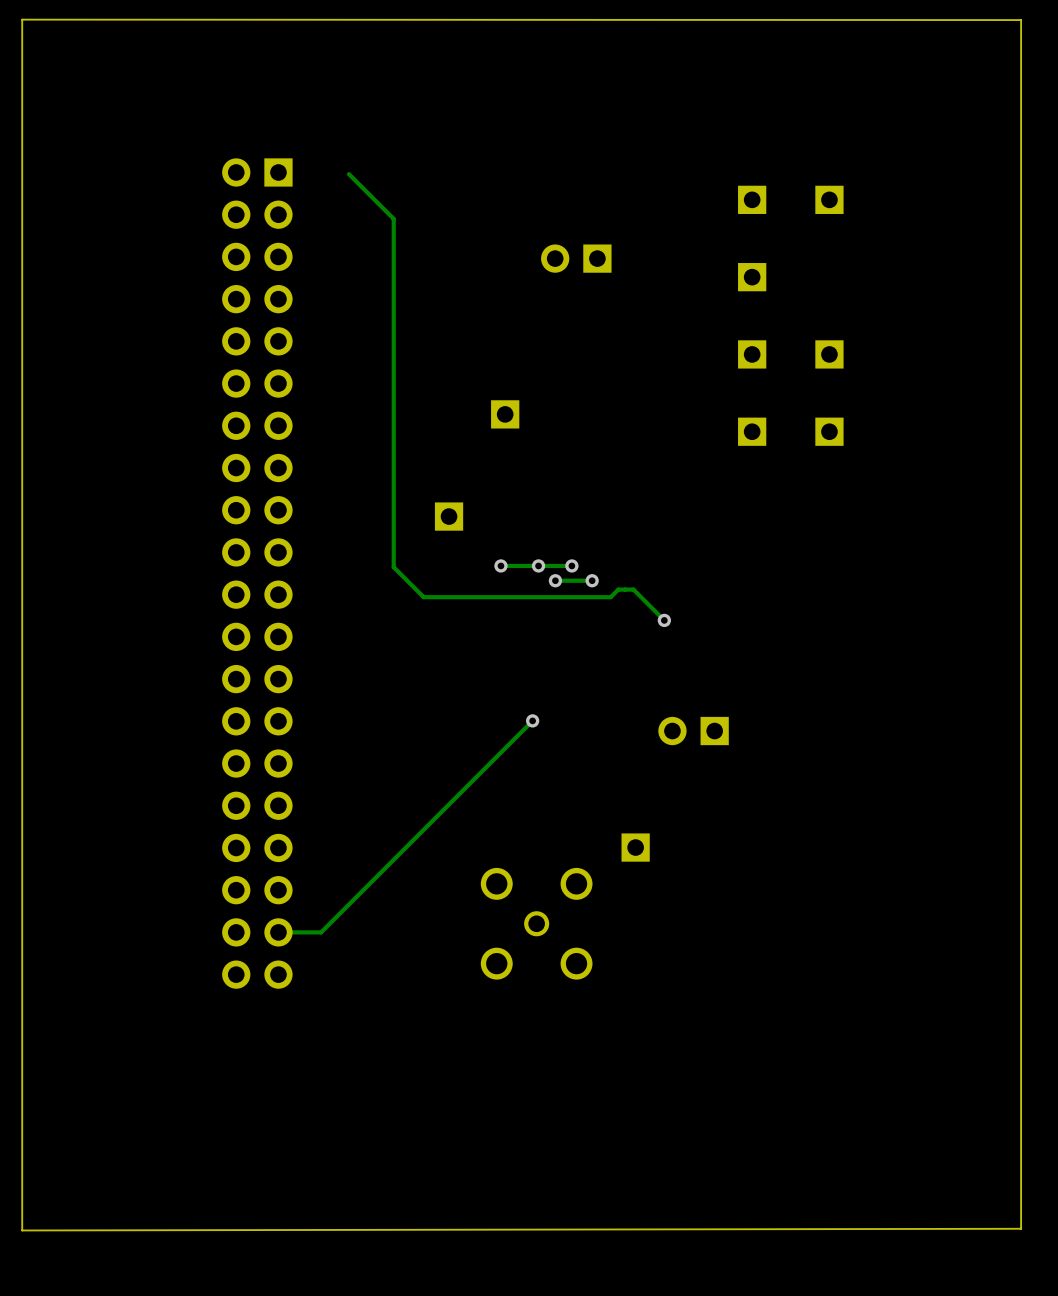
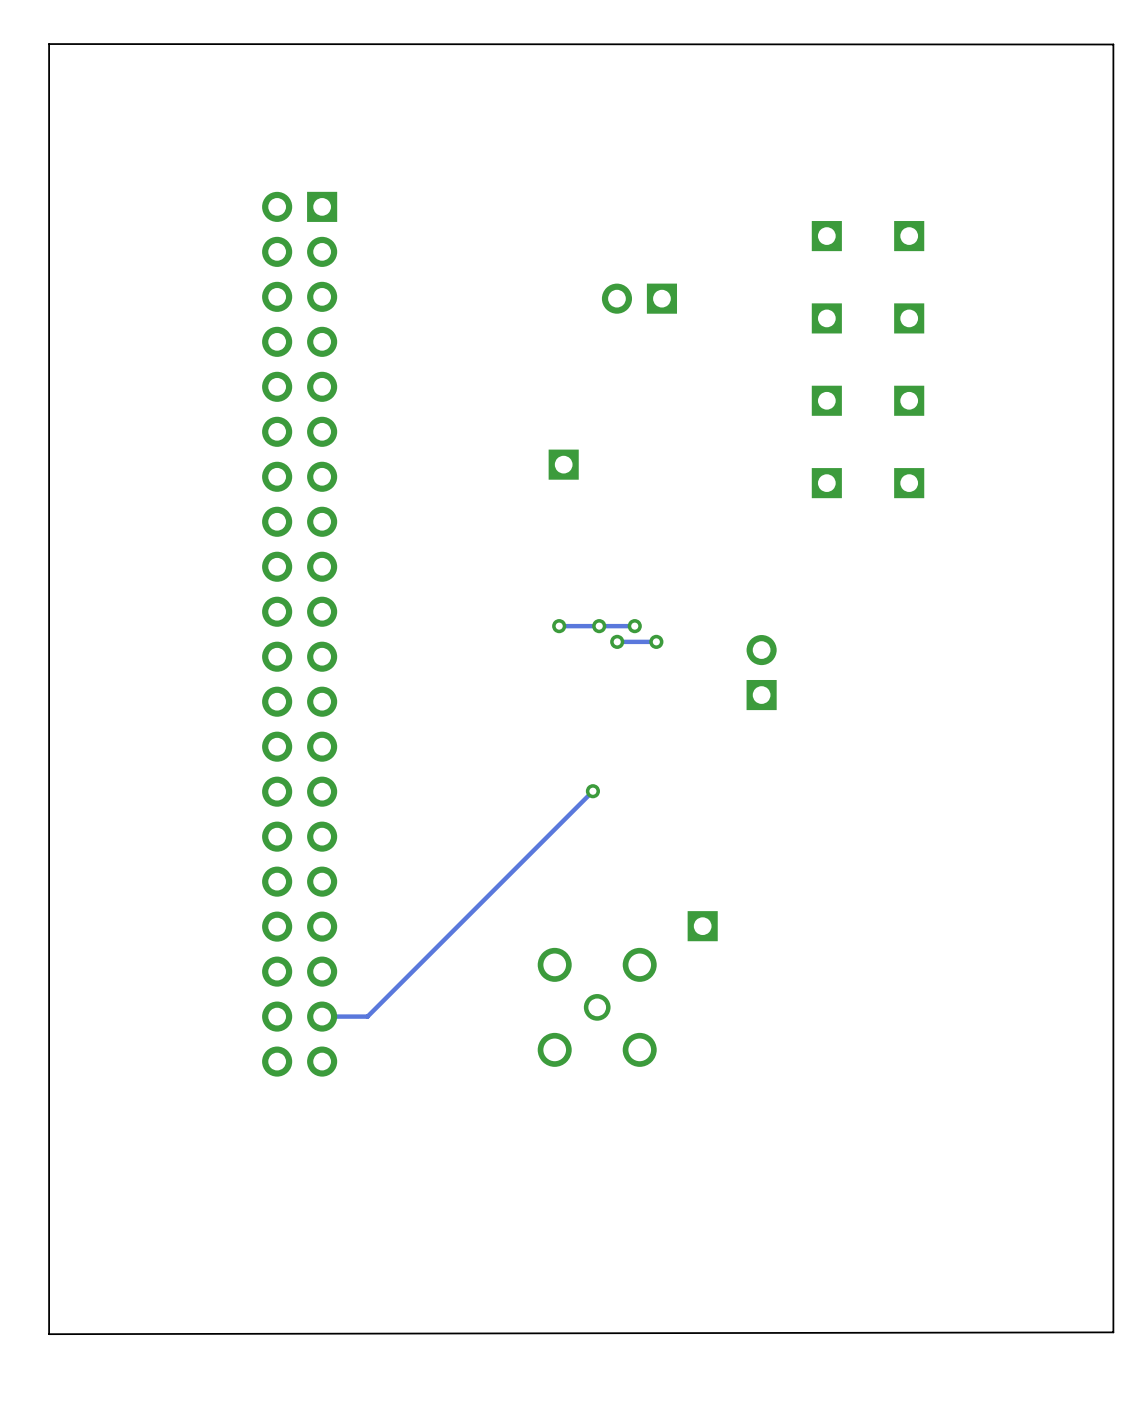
track: (348, 174) (393, 218) (393, 567) (423, 597) (610, 597) (618, 589) (633, 589) (664, 620) -> none
part: none -> (909, 318)
part: (449, 516) -> none
via: (664, 620) -> none
part rotation: 0° (693, 731) -> 90° clockwise (761, 672)
part position: (693, 731) -> (761, 672)

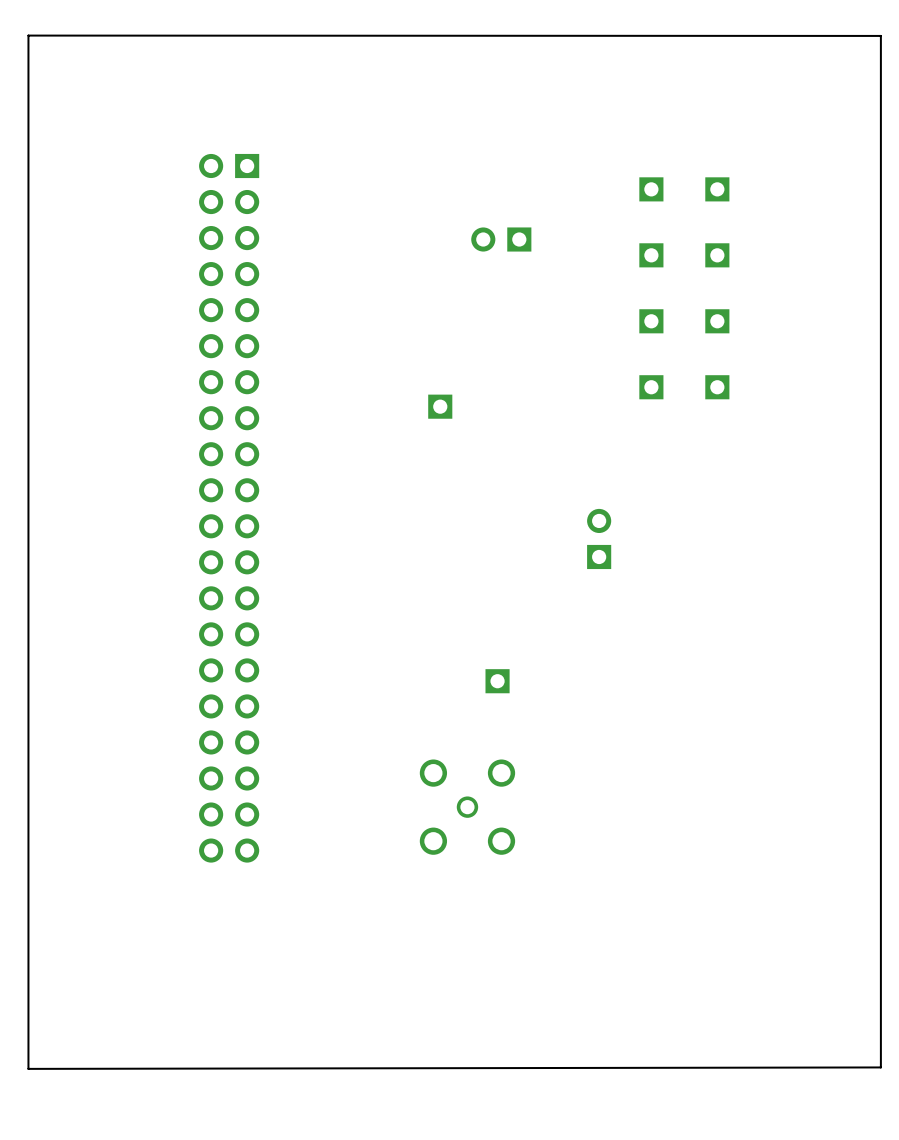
part position: (563, 464) -> (440, 406)
via: (559, 626) -> none
via: (599, 626) -> none
track: (634, 626) (559, 626) -> none
via: (634, 626) -> none
via: (617, 641) -> none
track: (656, 641) (617, 641) -> none
via: (656, 641) -> none
track: (592, 791) (367, 1016) (322, 1016) -> none
via: (592, 791) -> none
part position: (702, 926) -> (497, 681)

